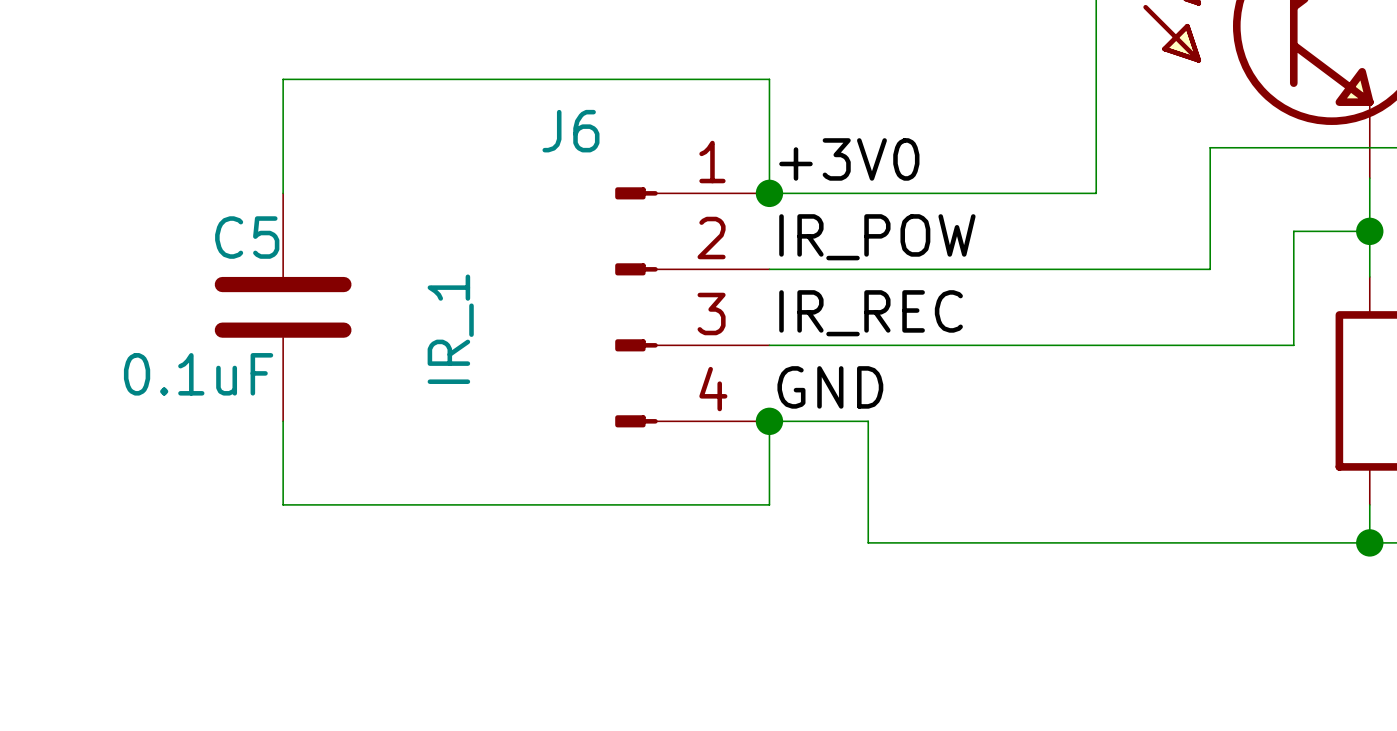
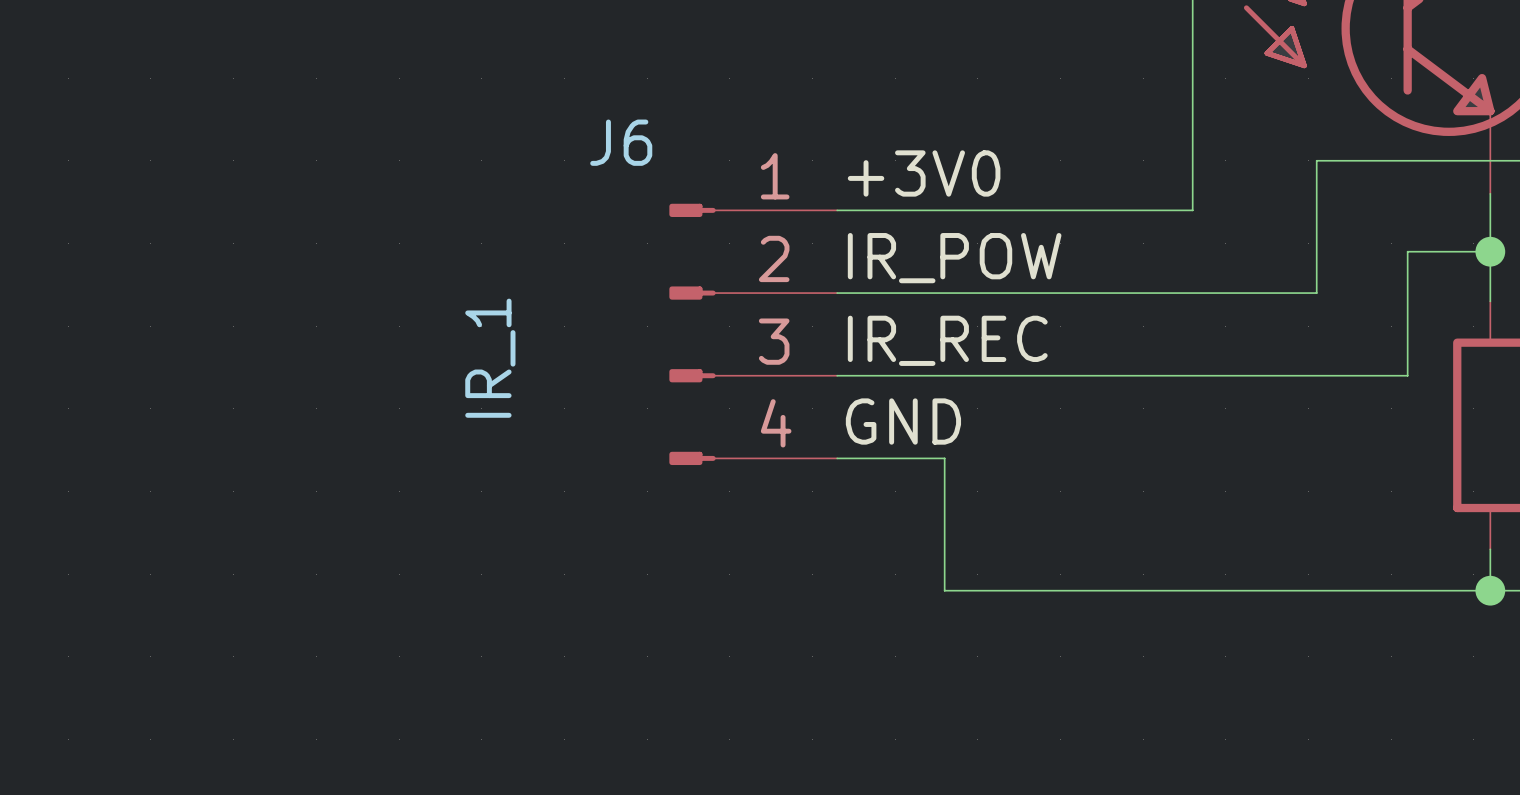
wire: (283, 193) (283, 79) (769, 79) (769, 193) -> none
junction: (769, 193) -> none
C5: 0.1uF (283, 307) -> none
wire: (283, 421) (283, 504) (769, 504) (769, 421) -> none
junction: (769, 421) -> none

